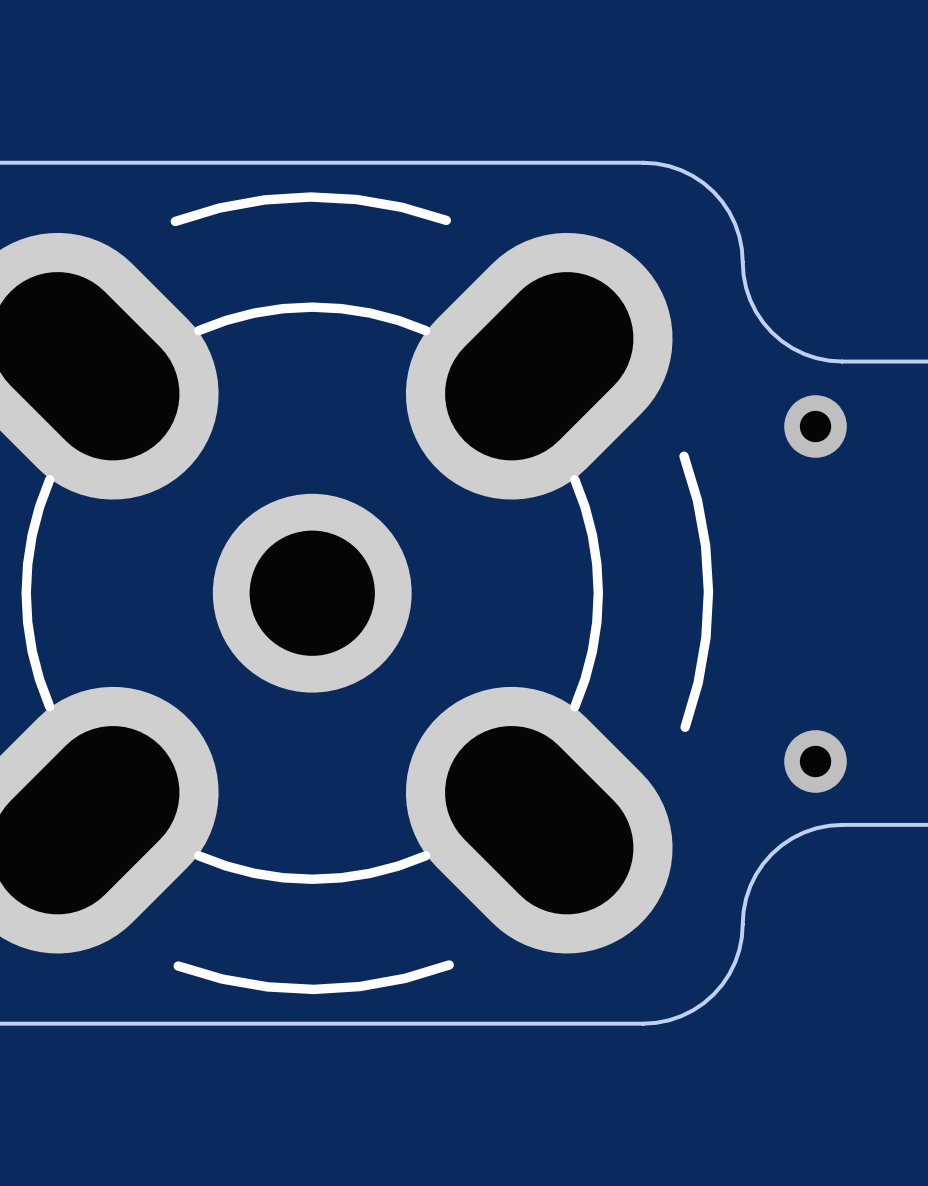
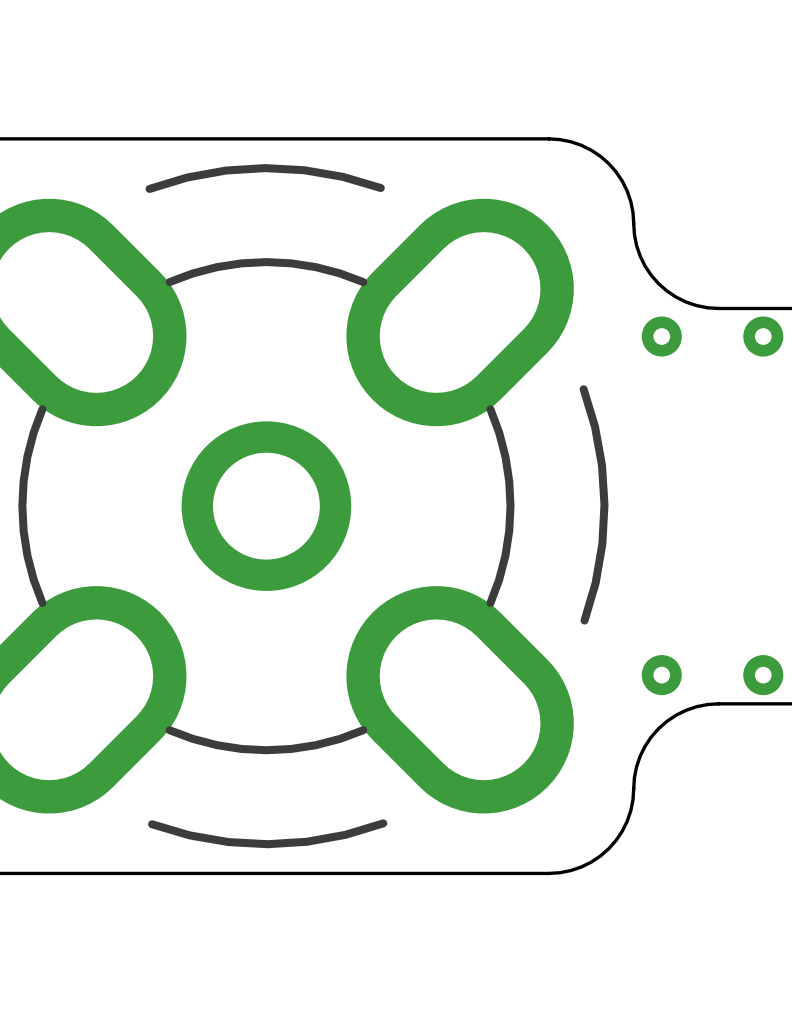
via: none -> (763, 336)
via position: (815, 426) -> (661, 336)
via position: (815, 761) -> (661, 675)
via: none -> (763, 675)

